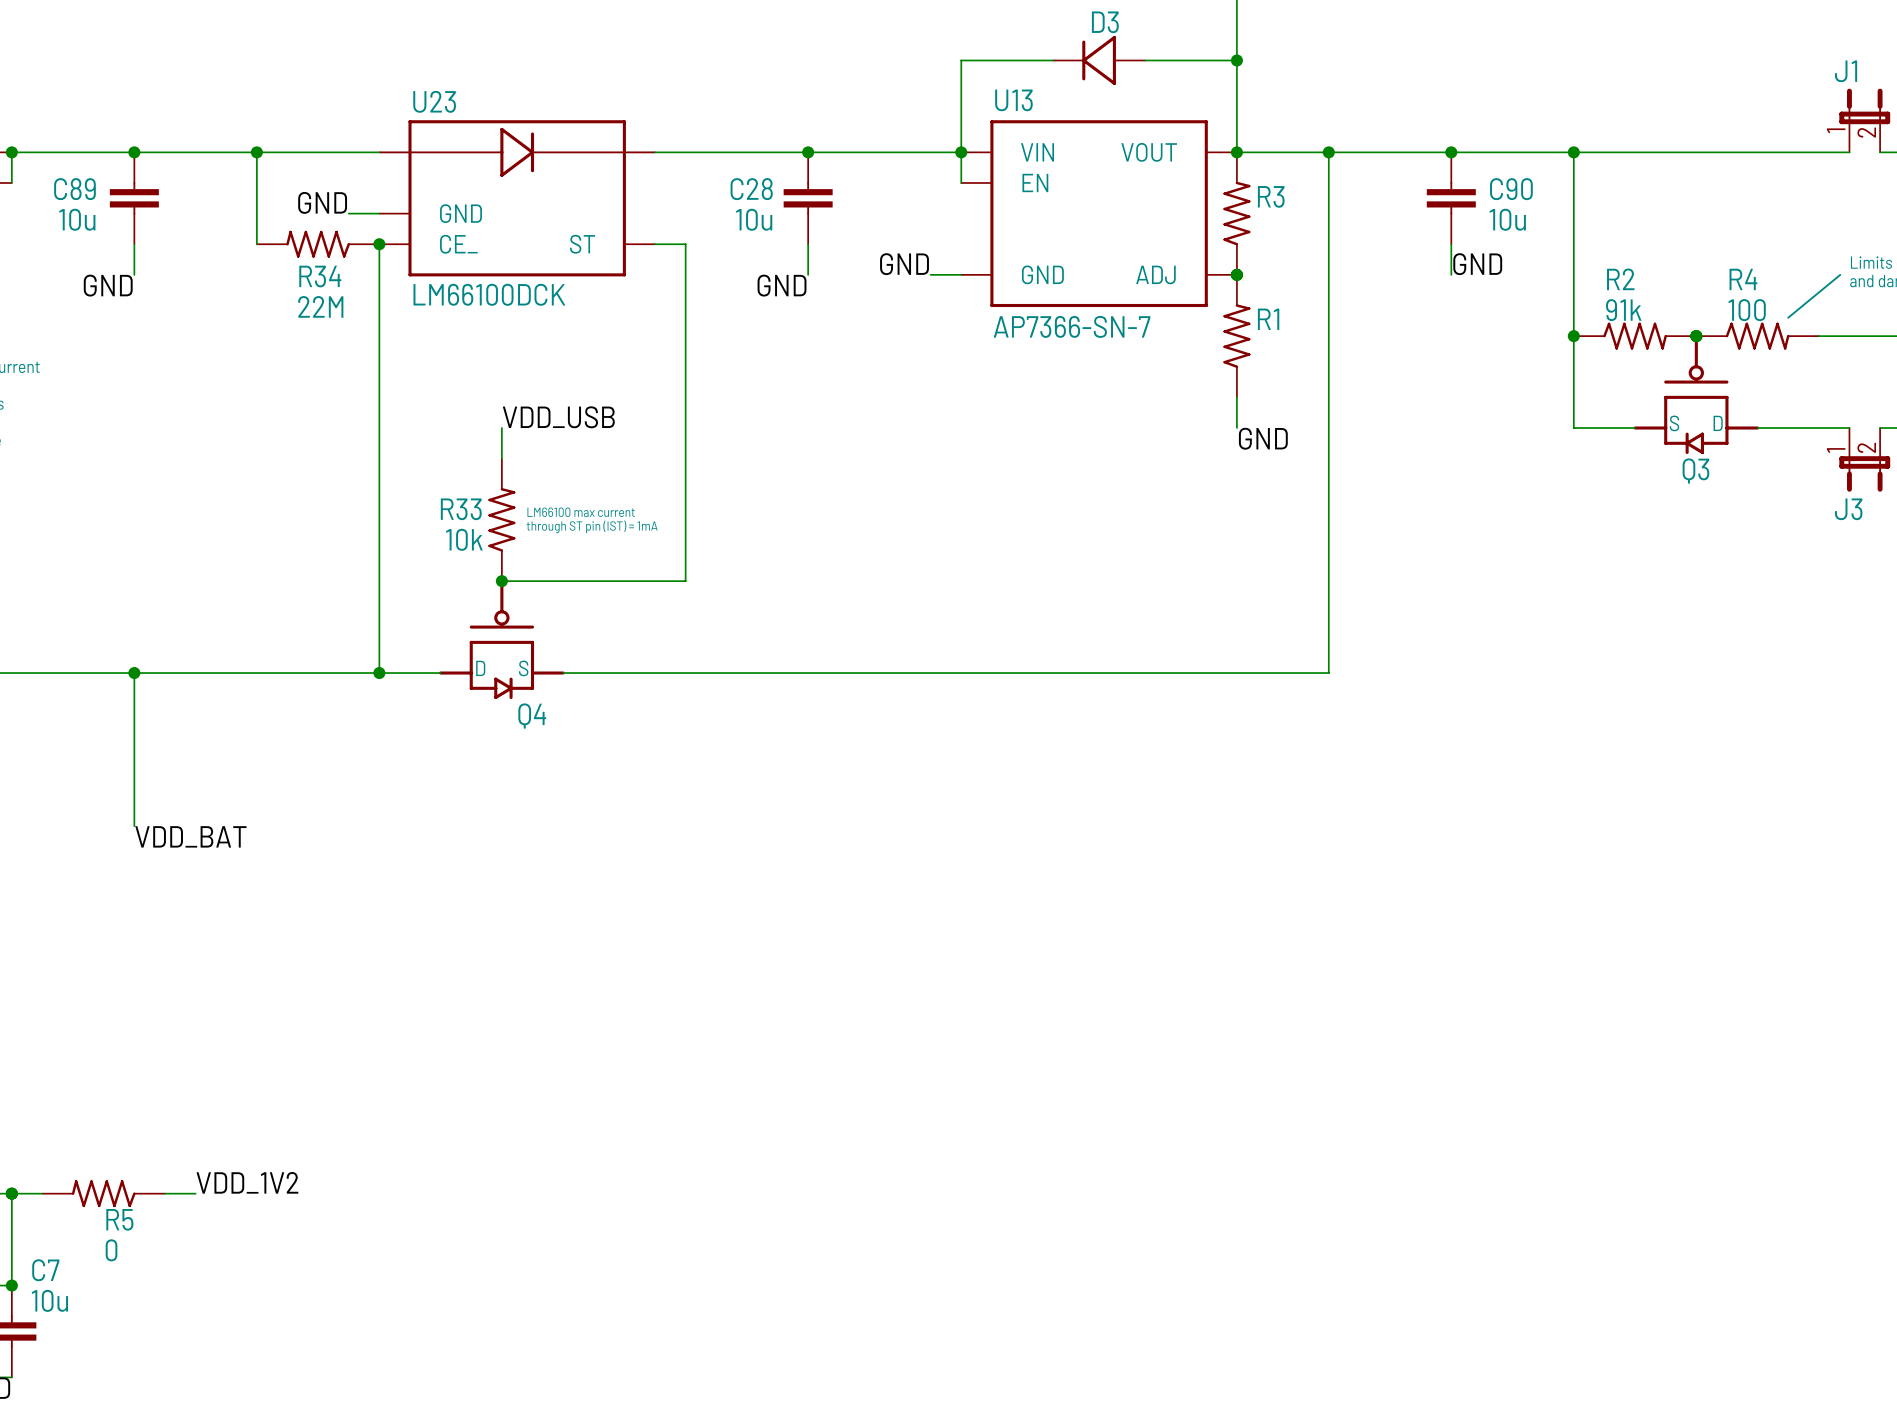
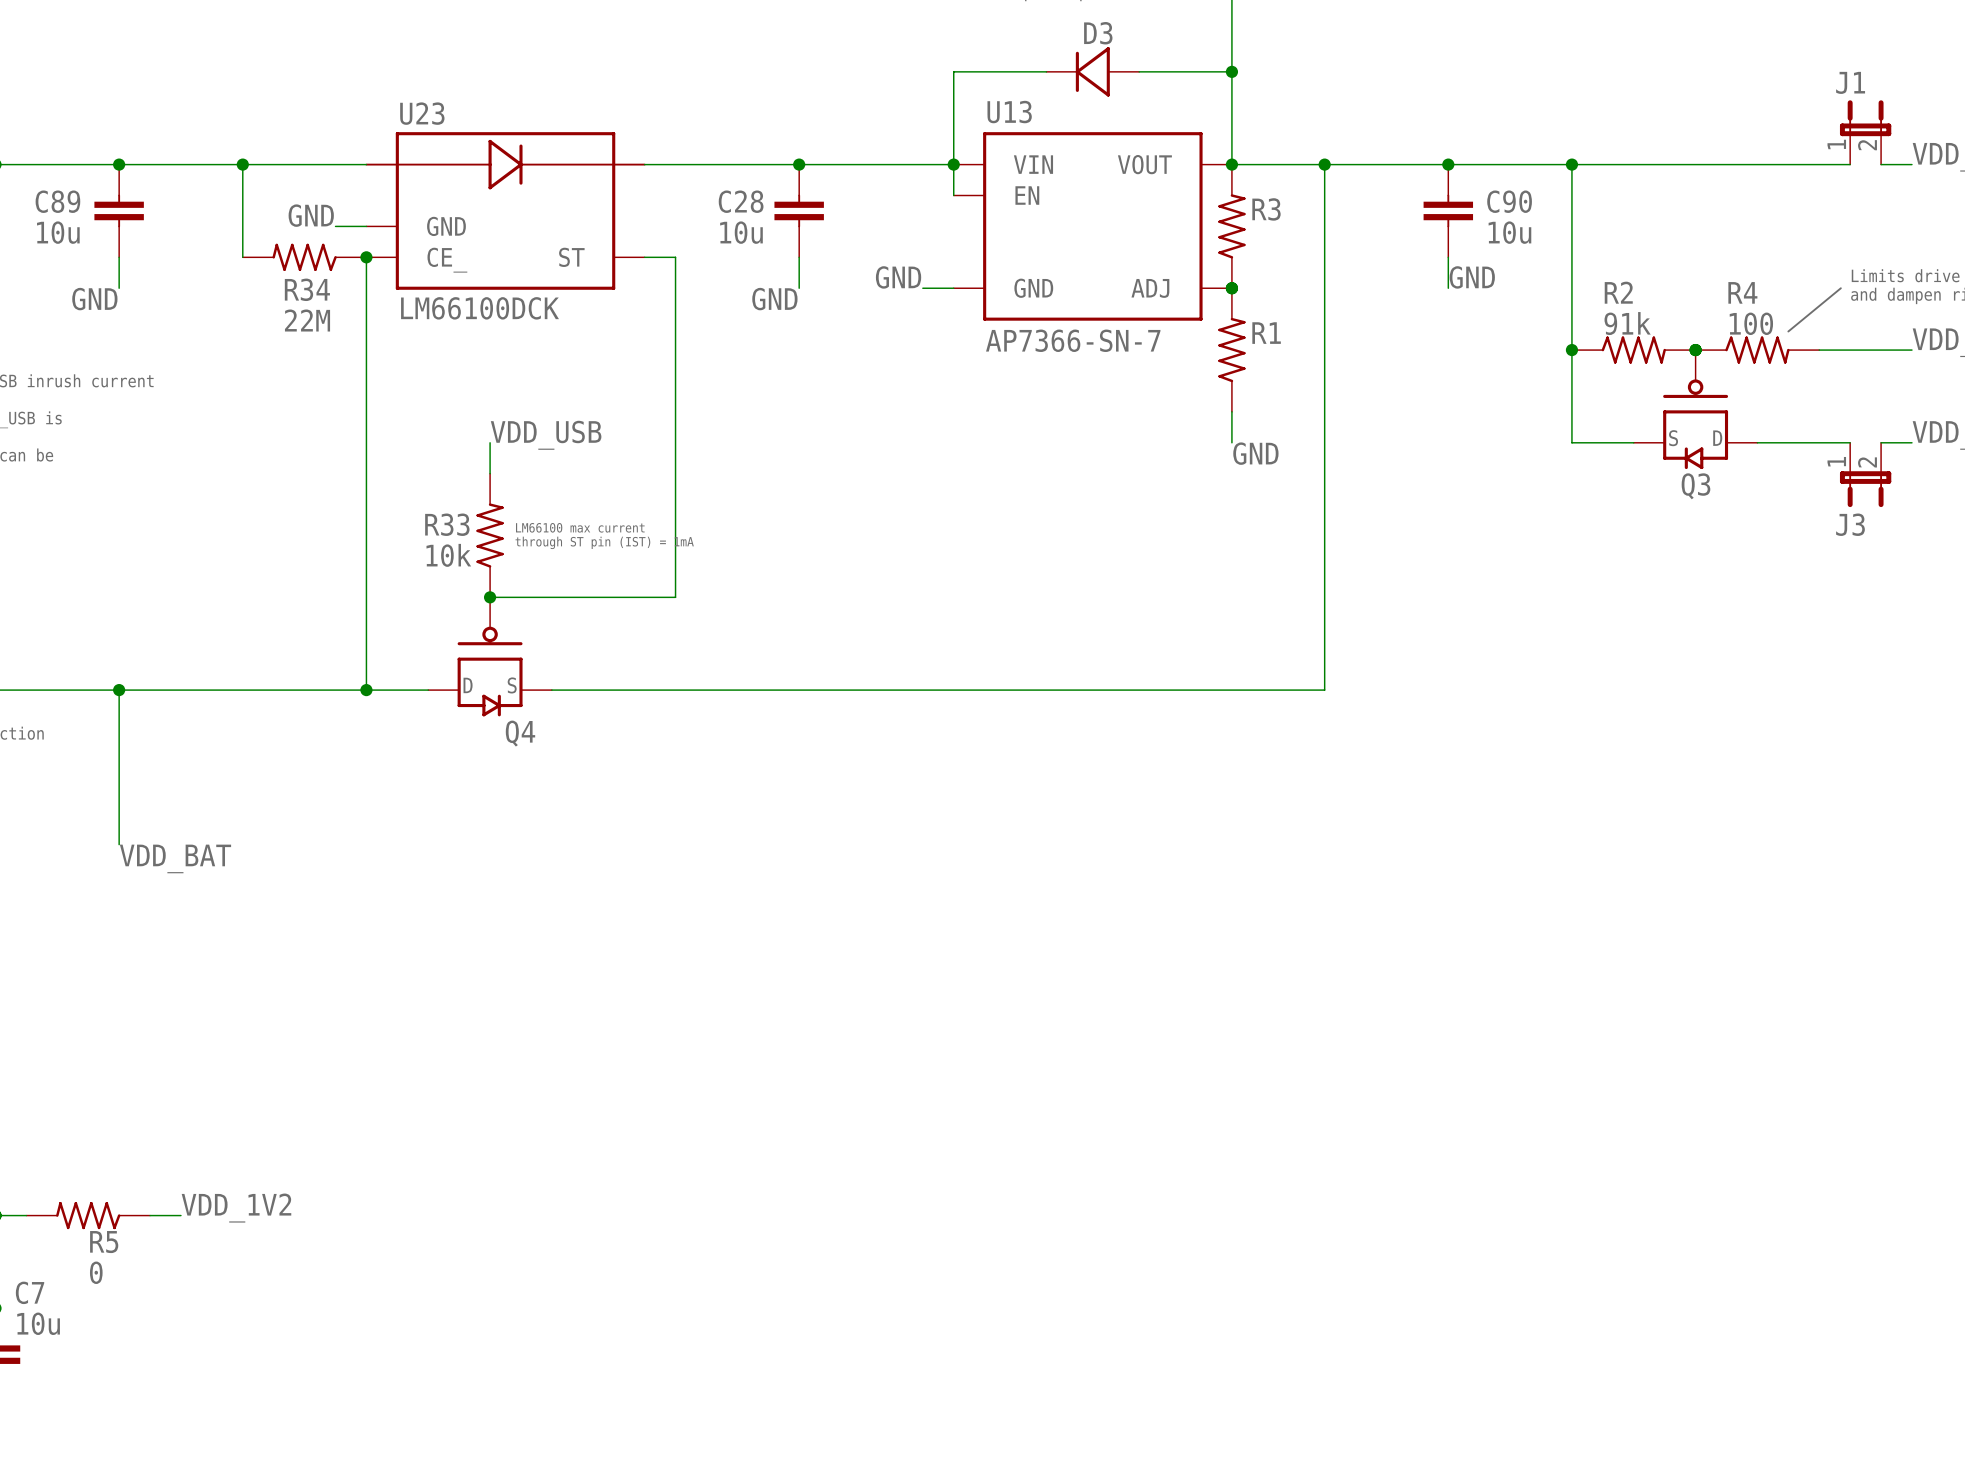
Q3 symbol: [1633, 334, 1760, 455] -> [1633, 350, 1758, 470]
Q4 symbol: [439, 579, 565, 700] -> [428, 597, 552, 717]

